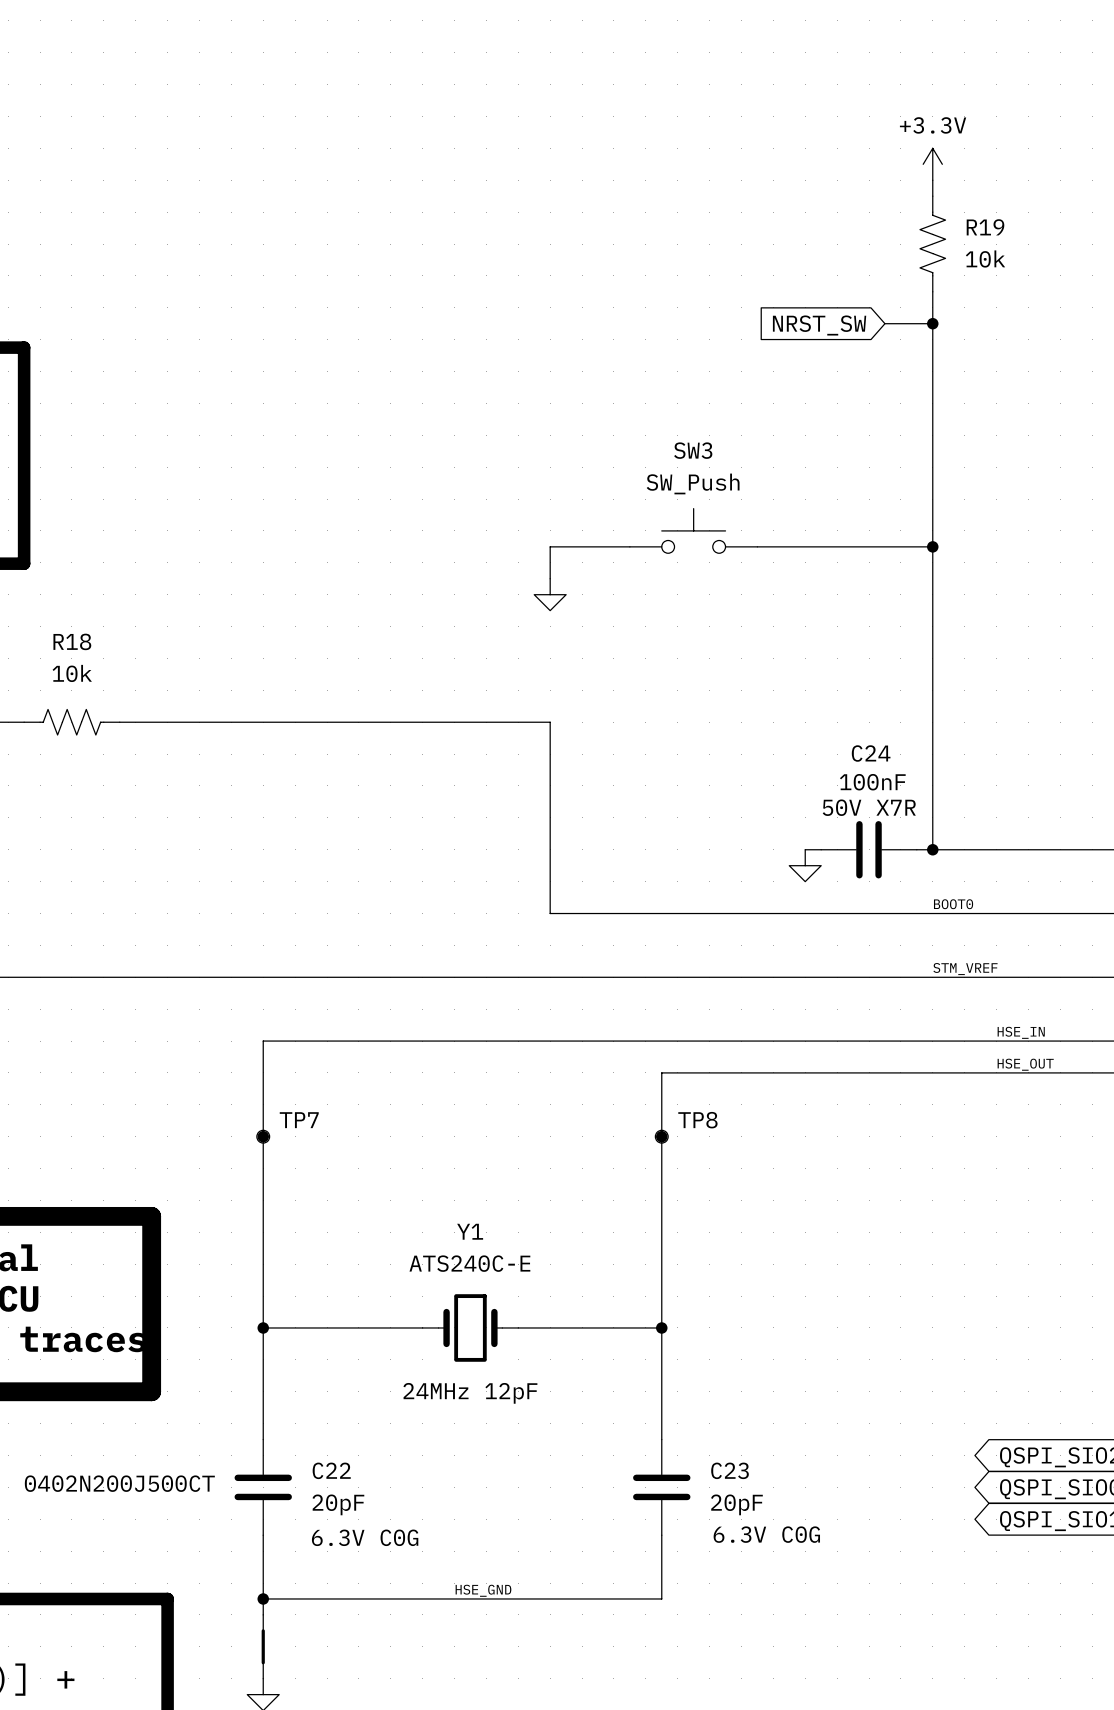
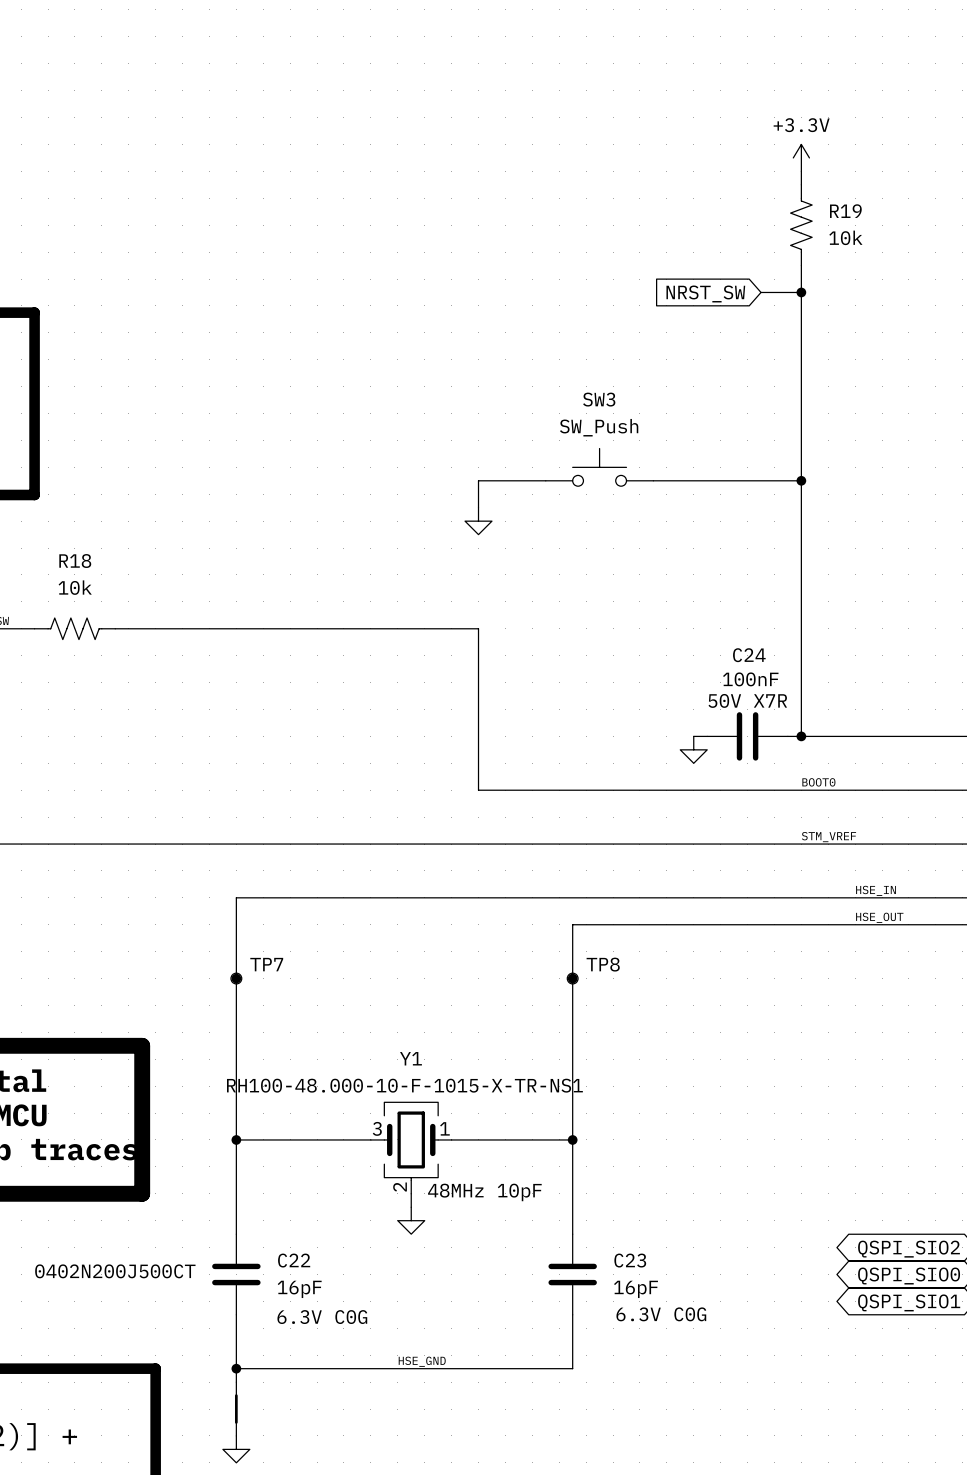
Y1 value: ATS240C-E (469, 1263) -> RH100-48.000-10-F-1015-X-TR-NS1 (404, 1085)
Y1 symbol: [422, 1294, 519, 1362] -> [370, 1102, 452, 1194]
wire: none -> (411, 1193) (411, 1207)
text: 24MHz 12pF (470, 1393) -> 48MHz 10pF (484, 1192)
power symbol: none -> (411, 1220)
C22 value: 20pF (338, 1504) -> 16pF (299, 1289)
C23 value: 20pF (736, 1504) -> 16pF (636, 1289)

